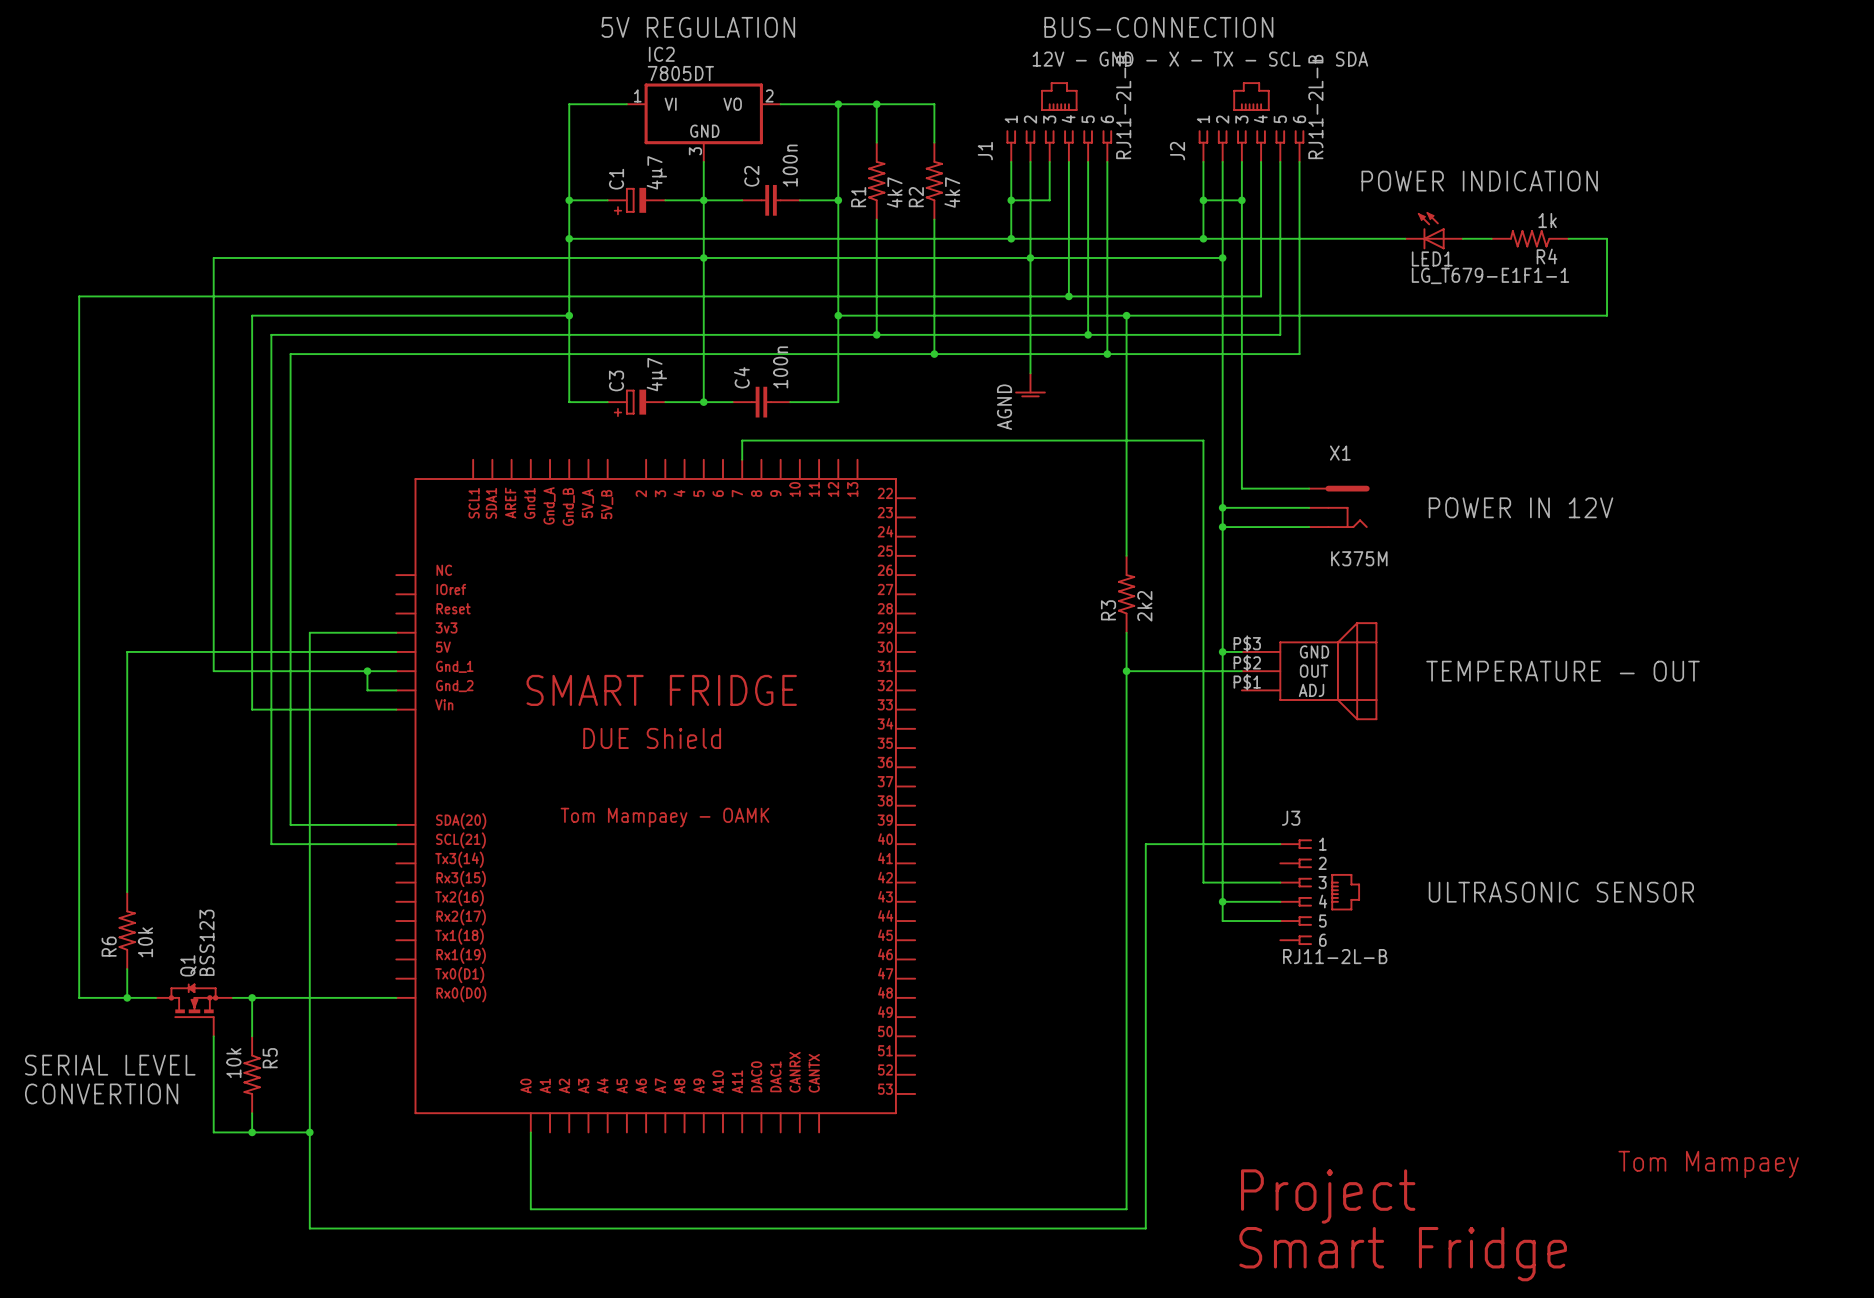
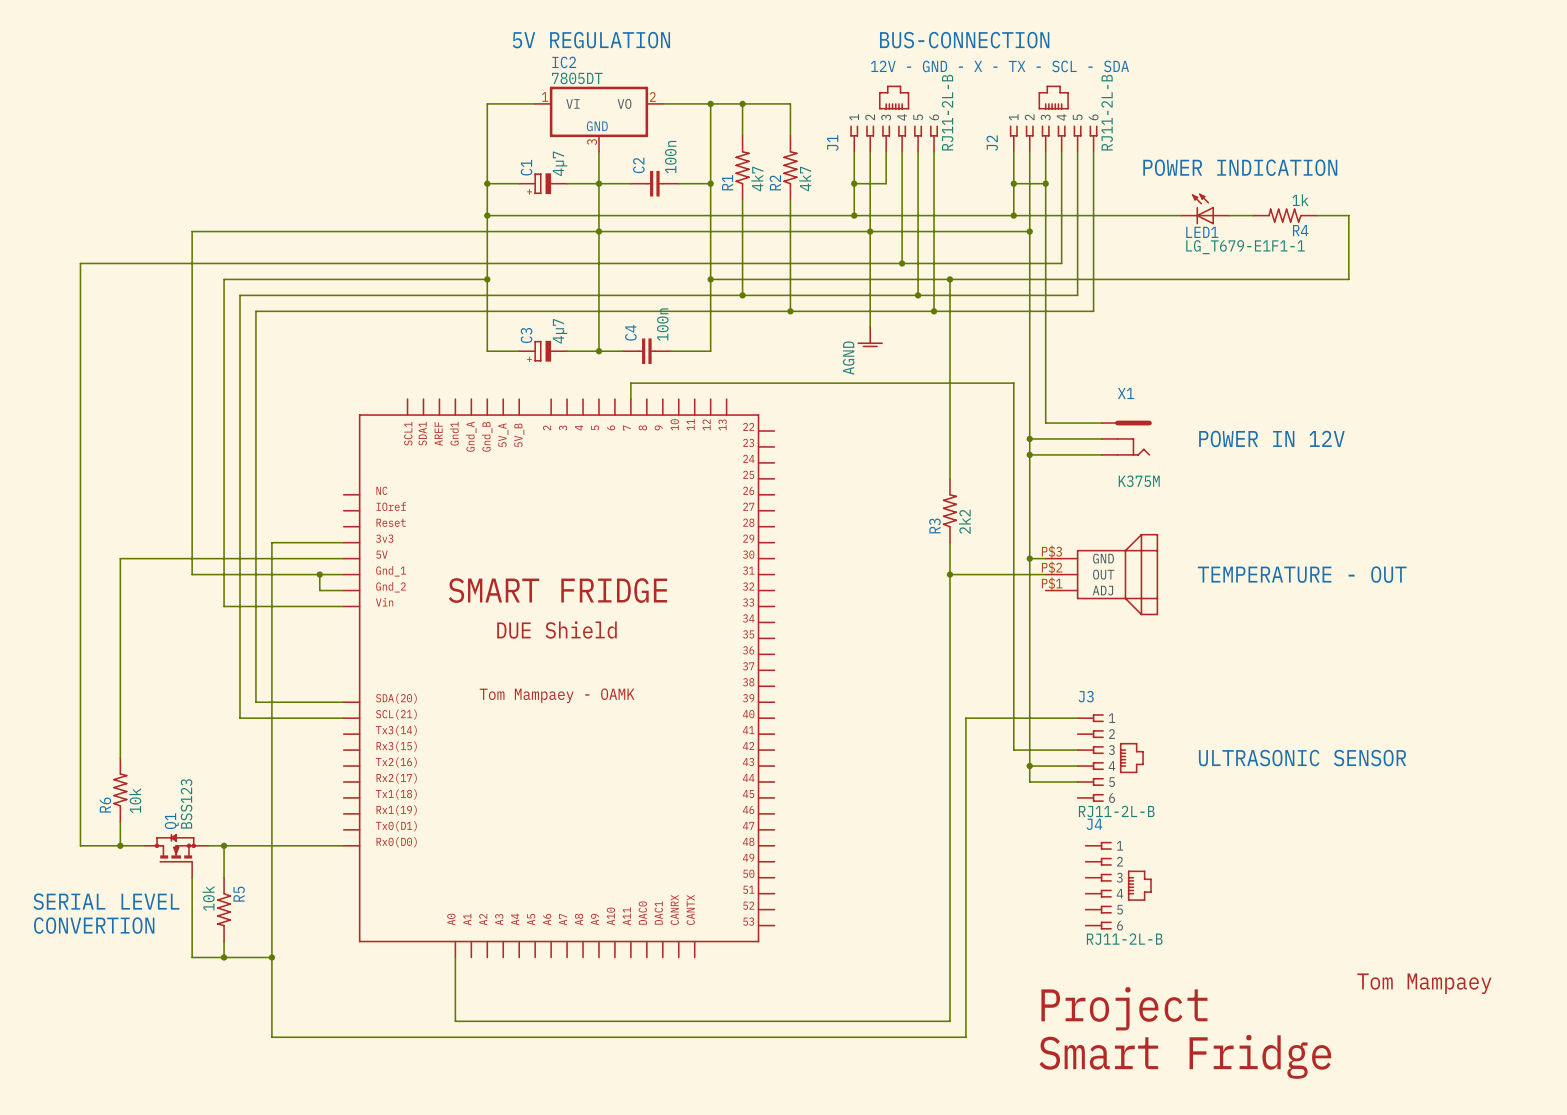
J4: none -> RJ11-2L-B (1118, 885)

